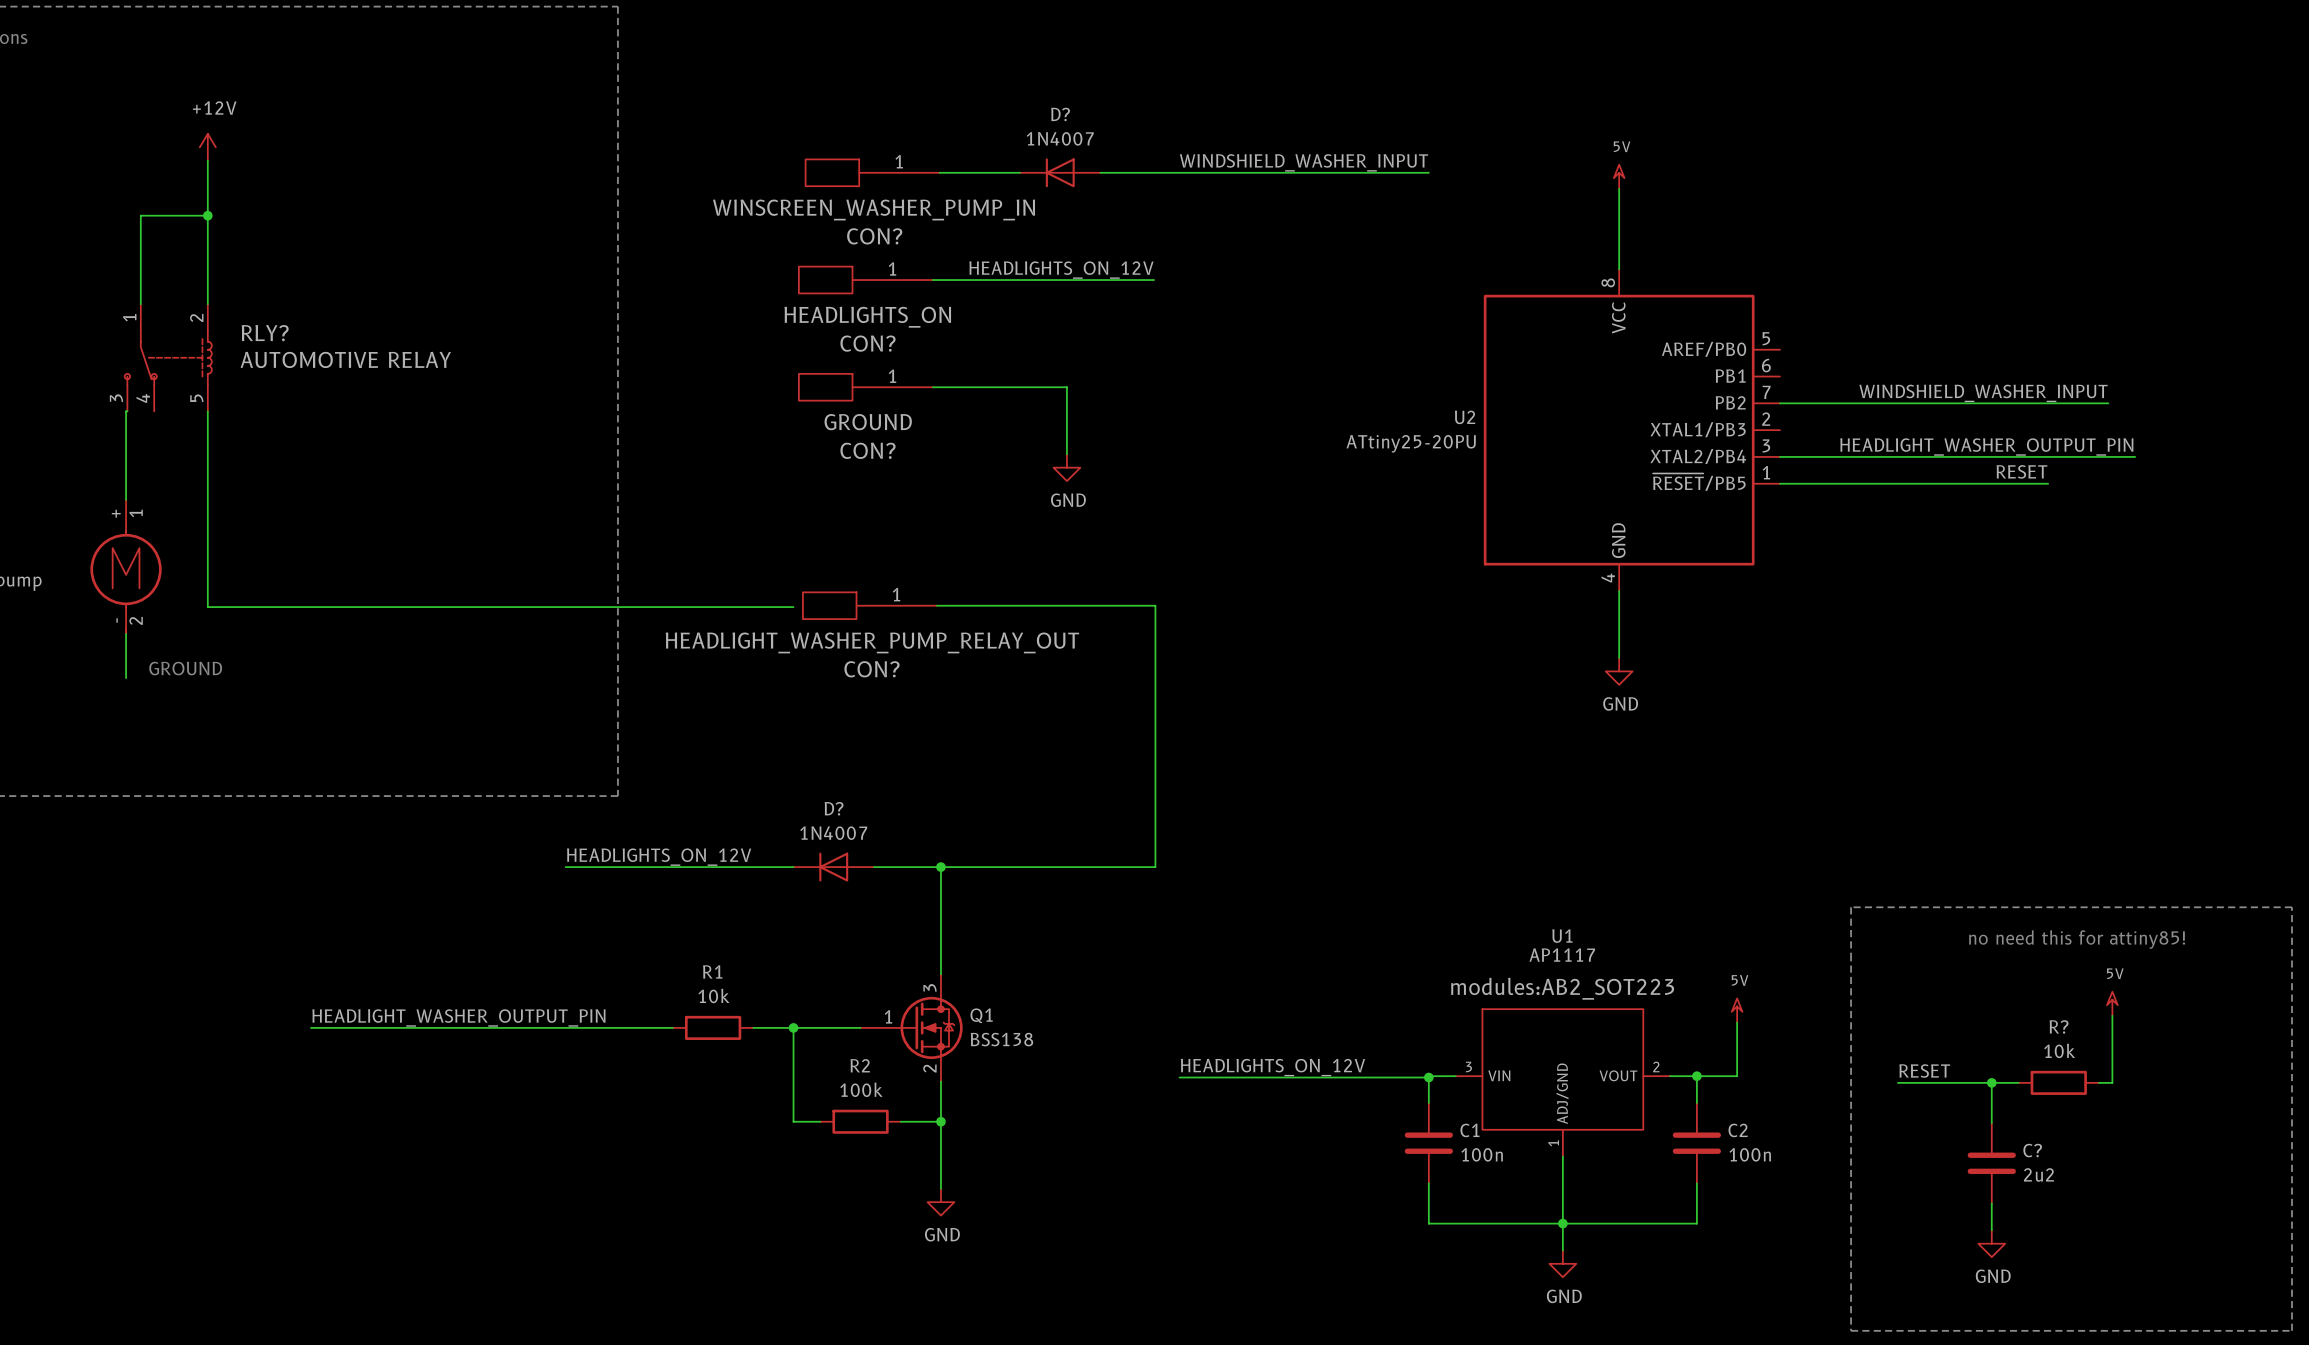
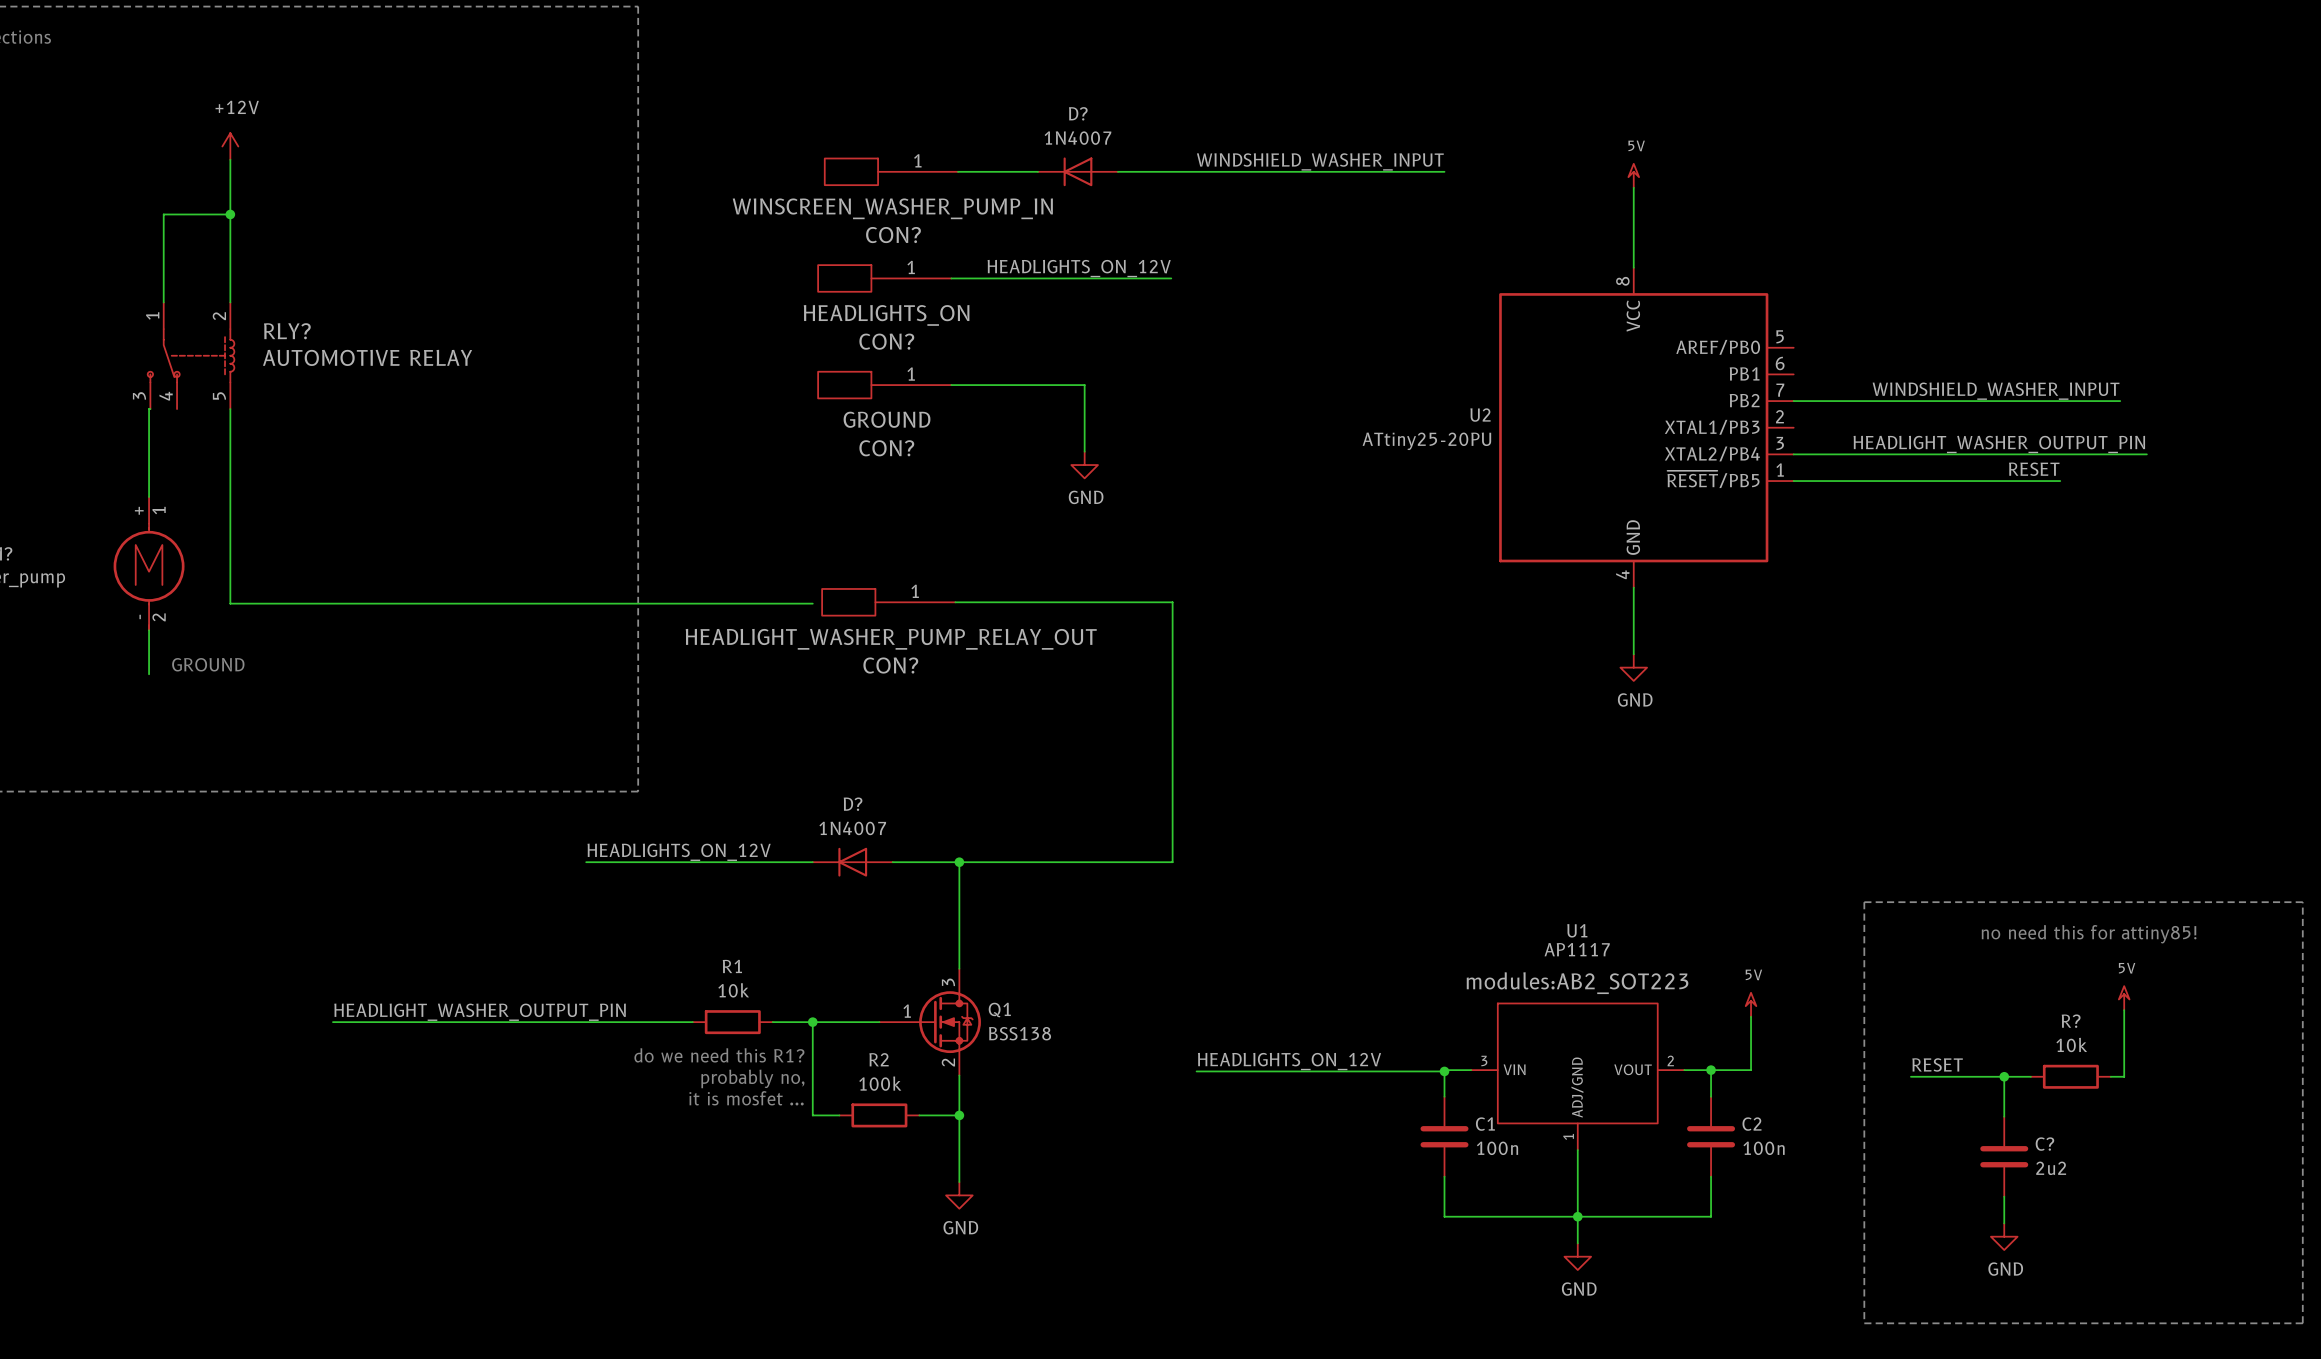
text: none -> do we need this R1? (719, 1055)
text: none -> probably no, (752, 1078)
text: none -> it is mosfet ... (746, 1098)

